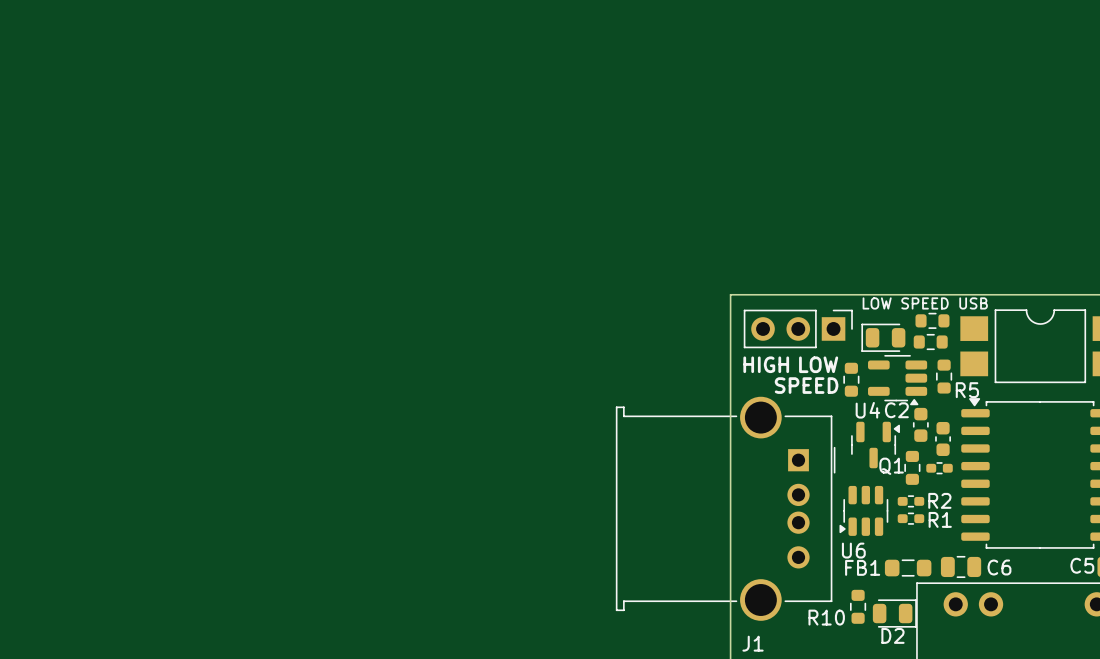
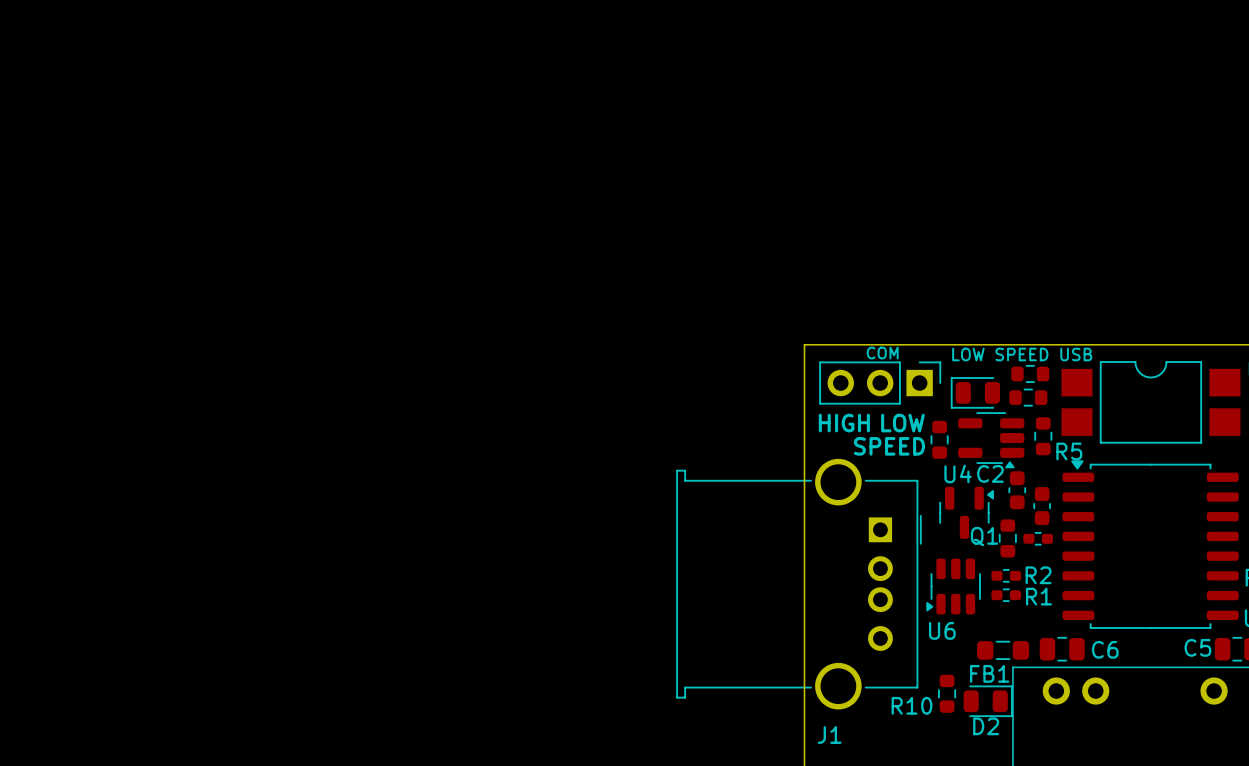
text: none -> COM (882, 353)
FB1 name position: FB1 (862, 567) -> FB1 (989, 673)

